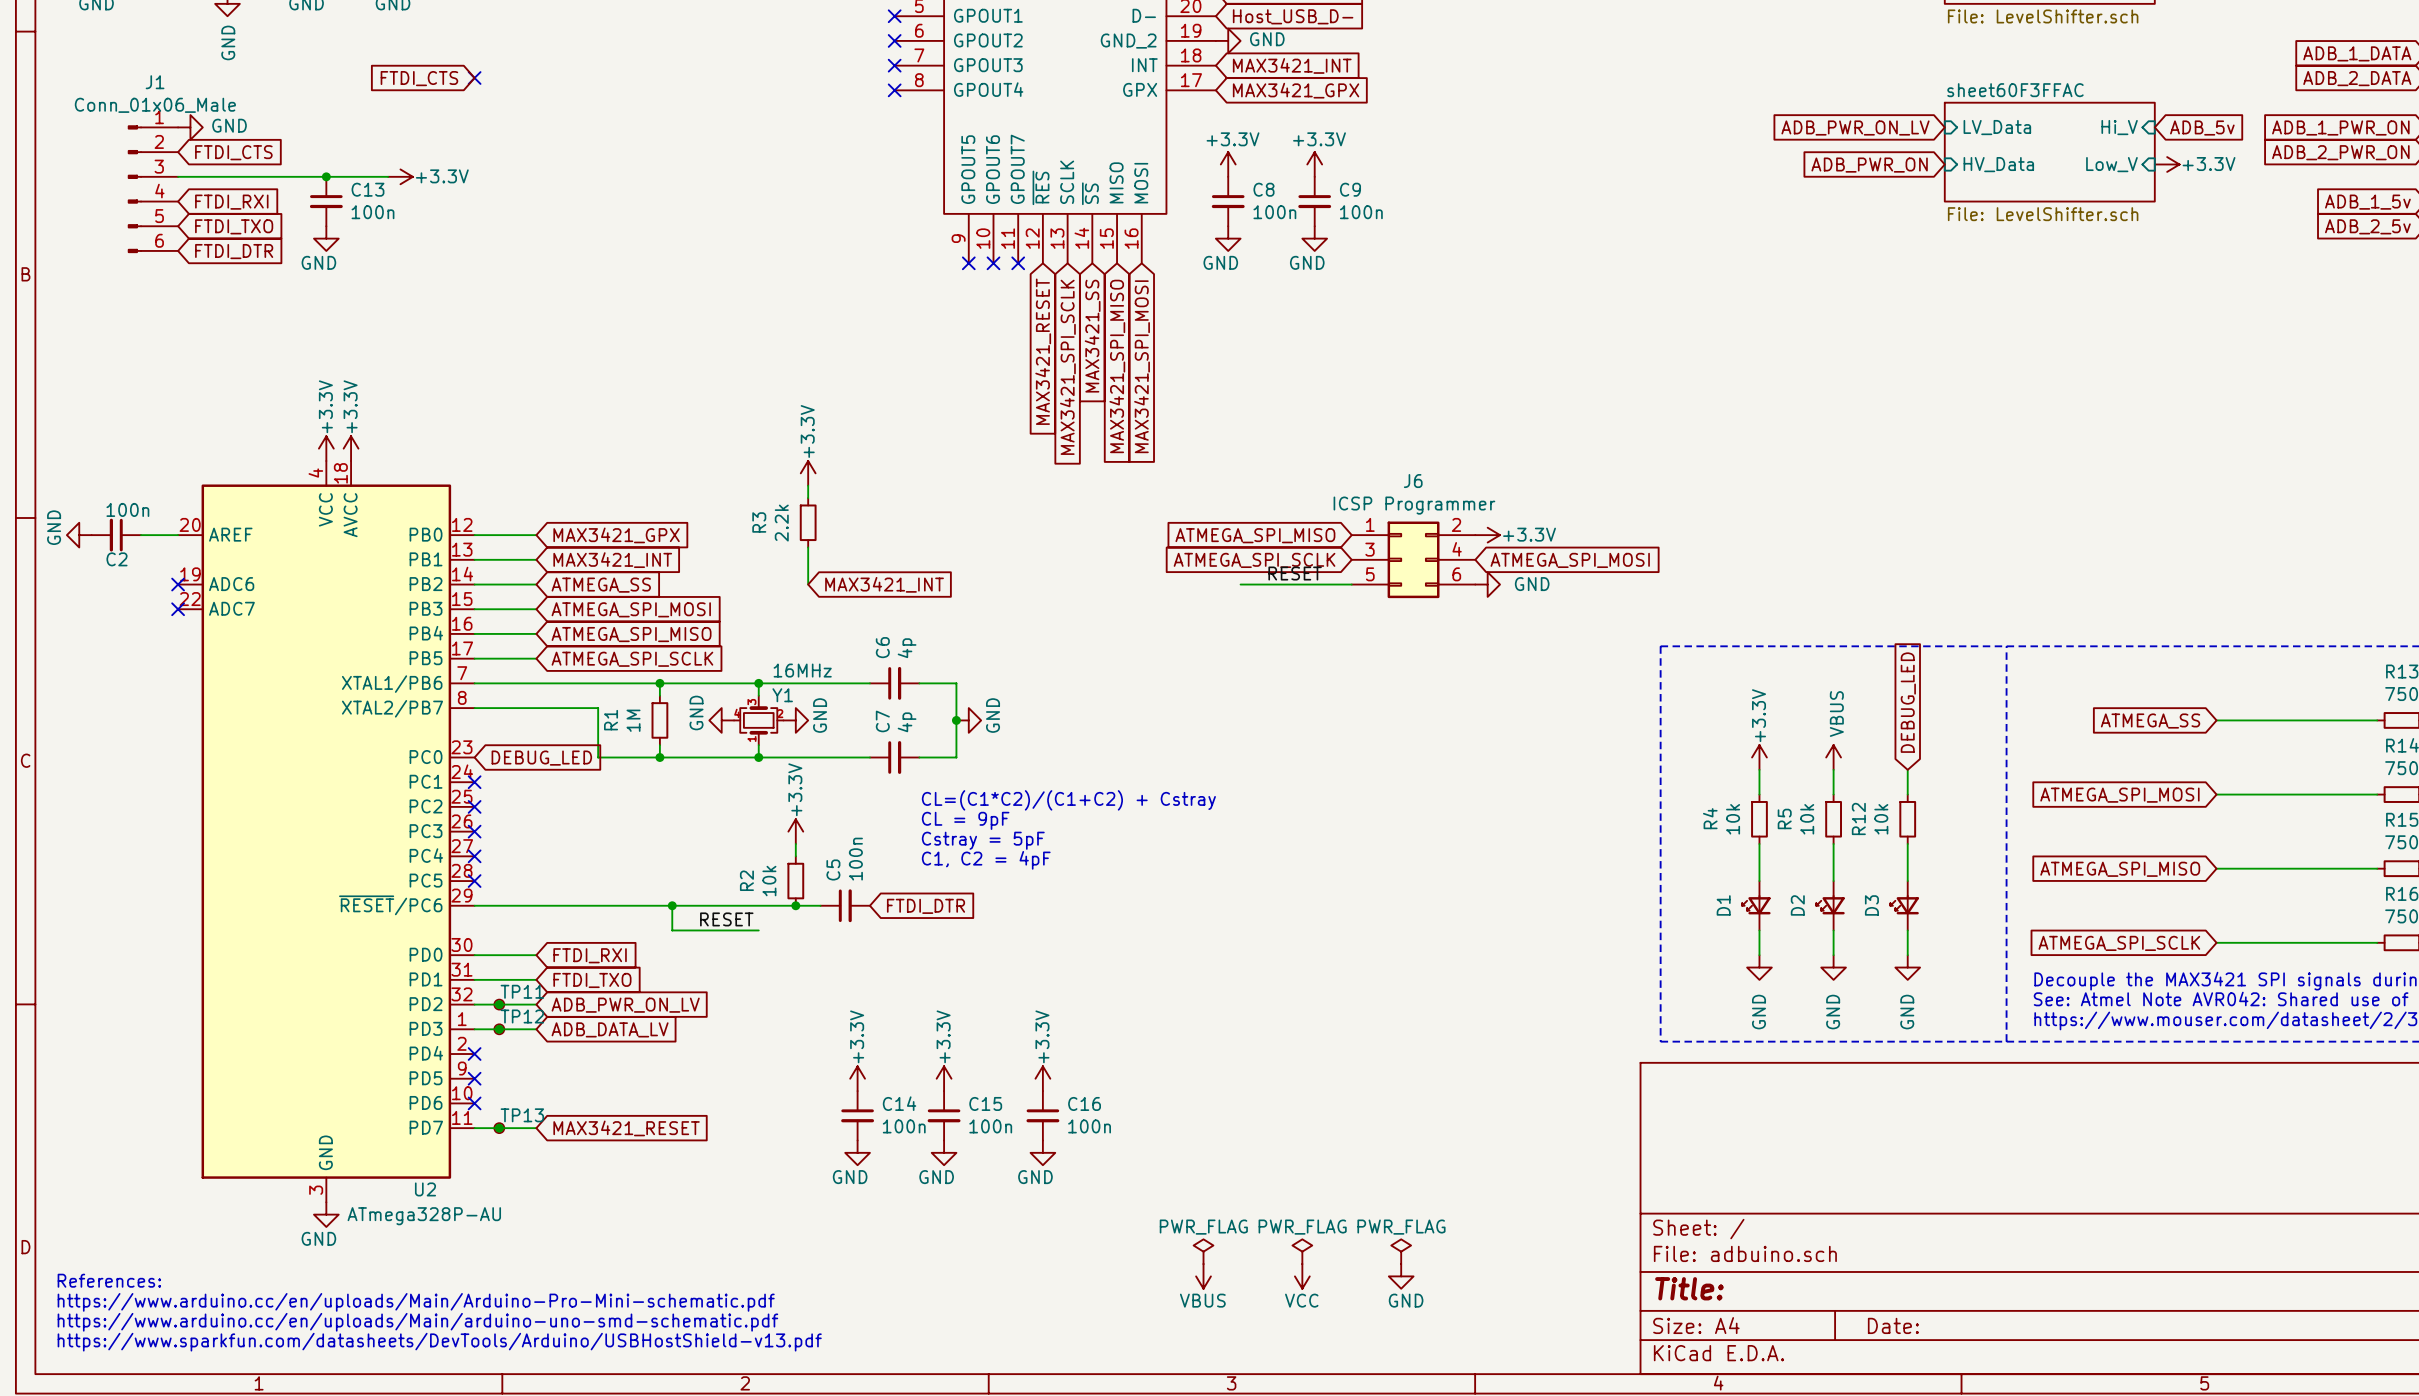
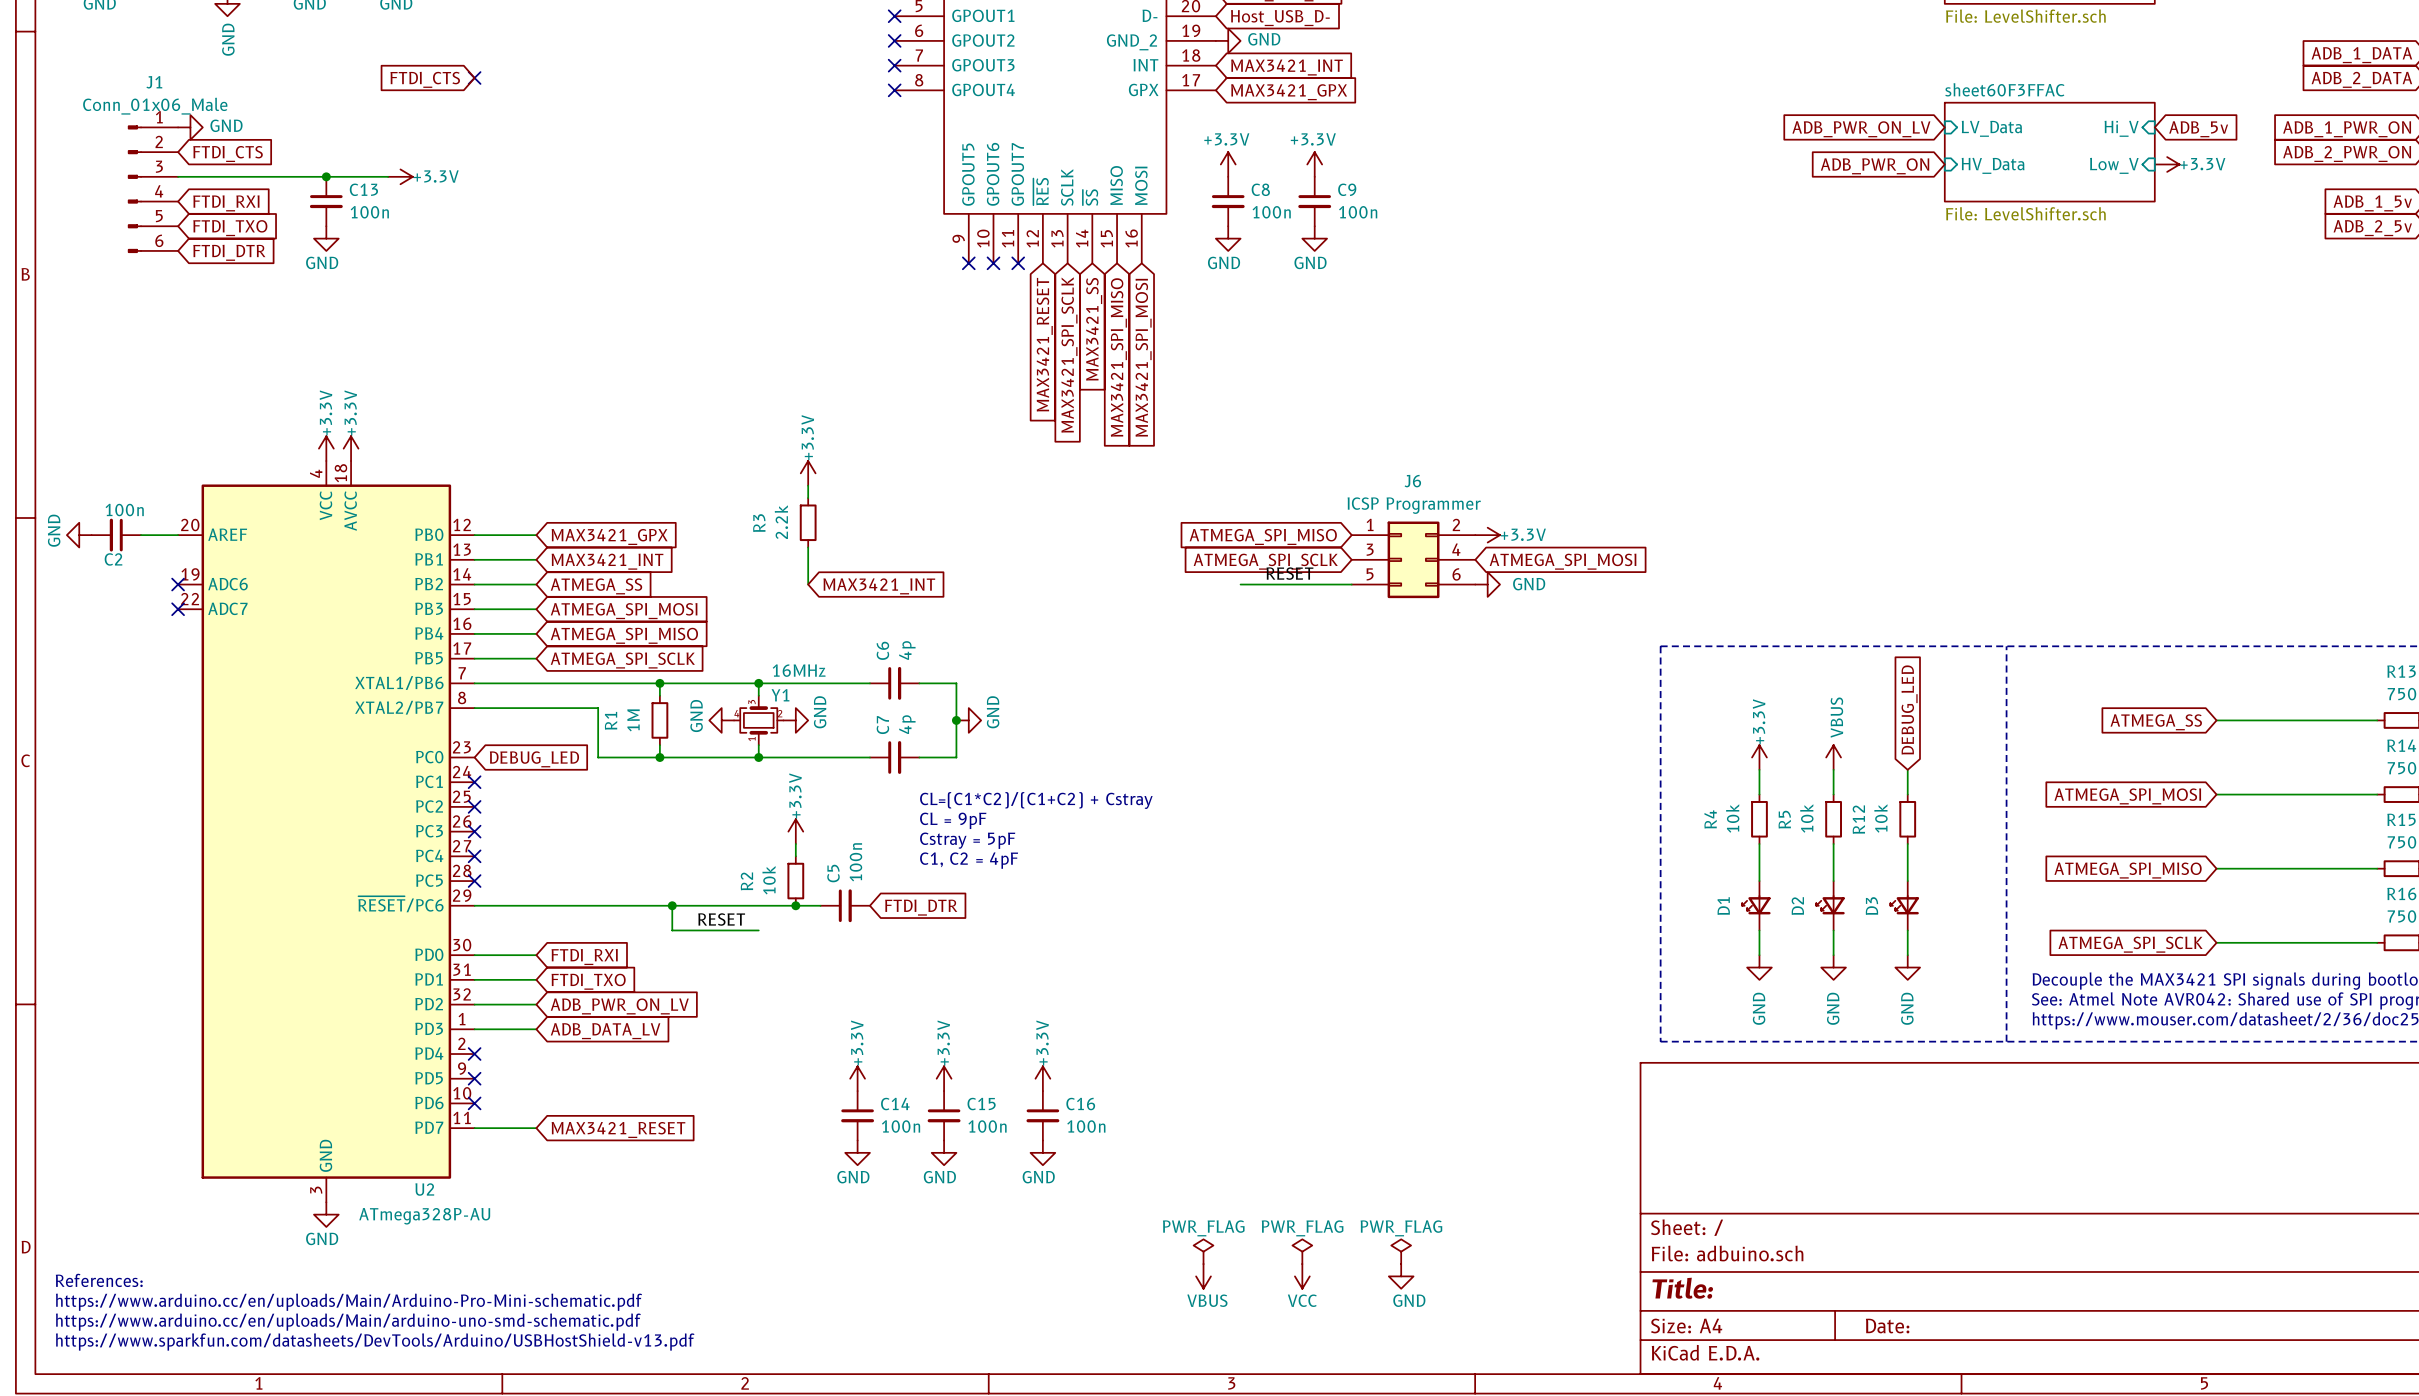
TP11: (499, 1004) -> none
junction: (499, 1004) -> none
TP12: (499, 1029) -> none
junction: (499, 1029) -> none
TP13: (499, 1128) -> none
junction: (499, 1128) -> none

